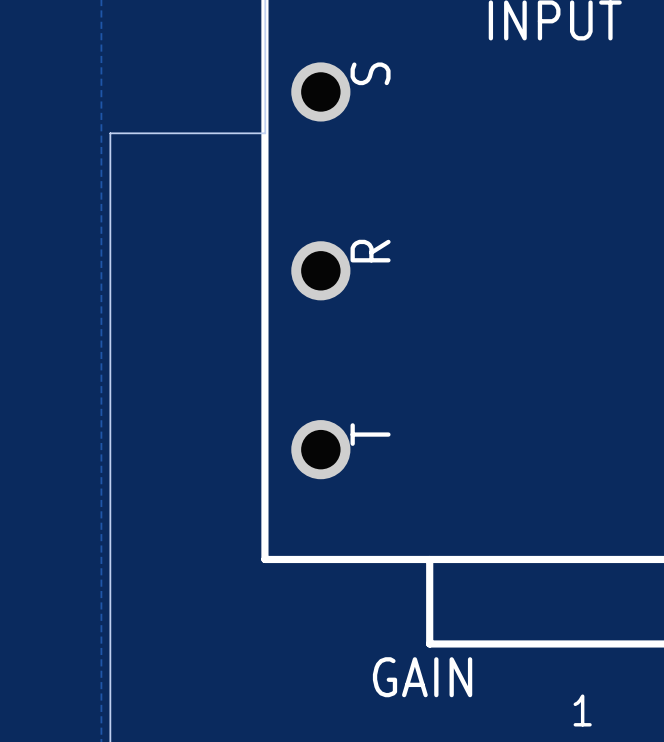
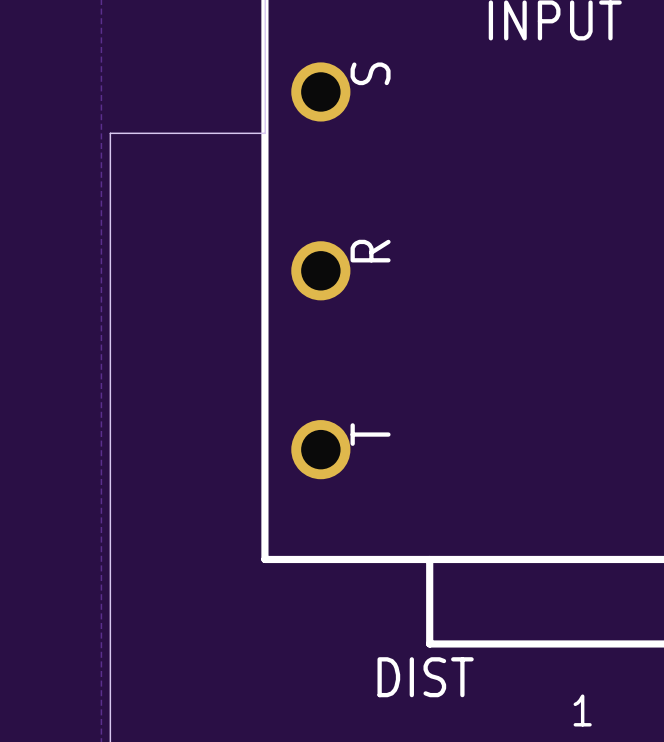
GAIN name: GAIN (422, 677) -> DIST (425, 677)

